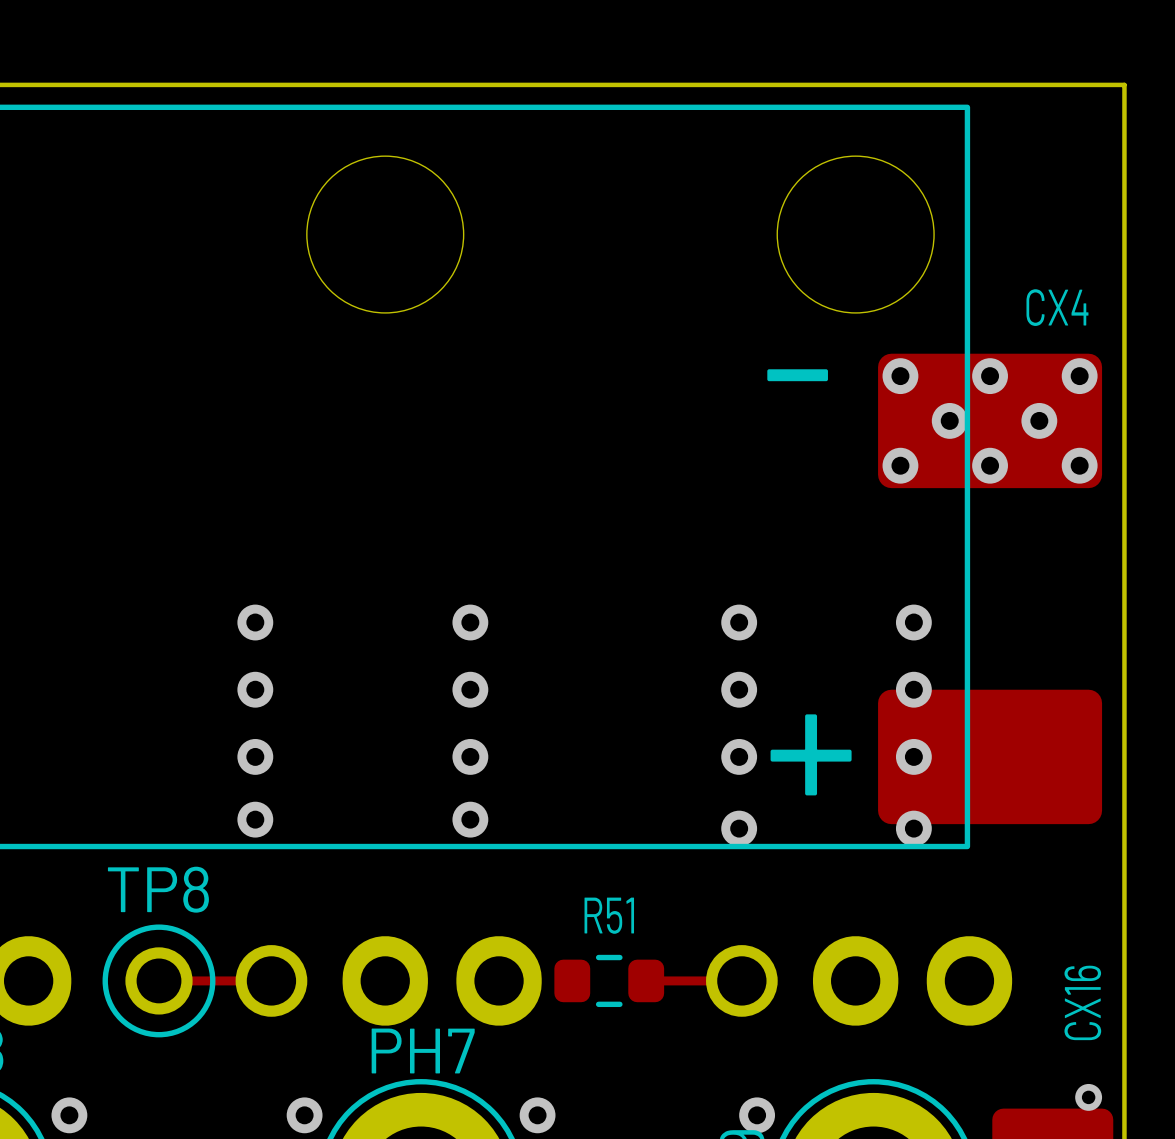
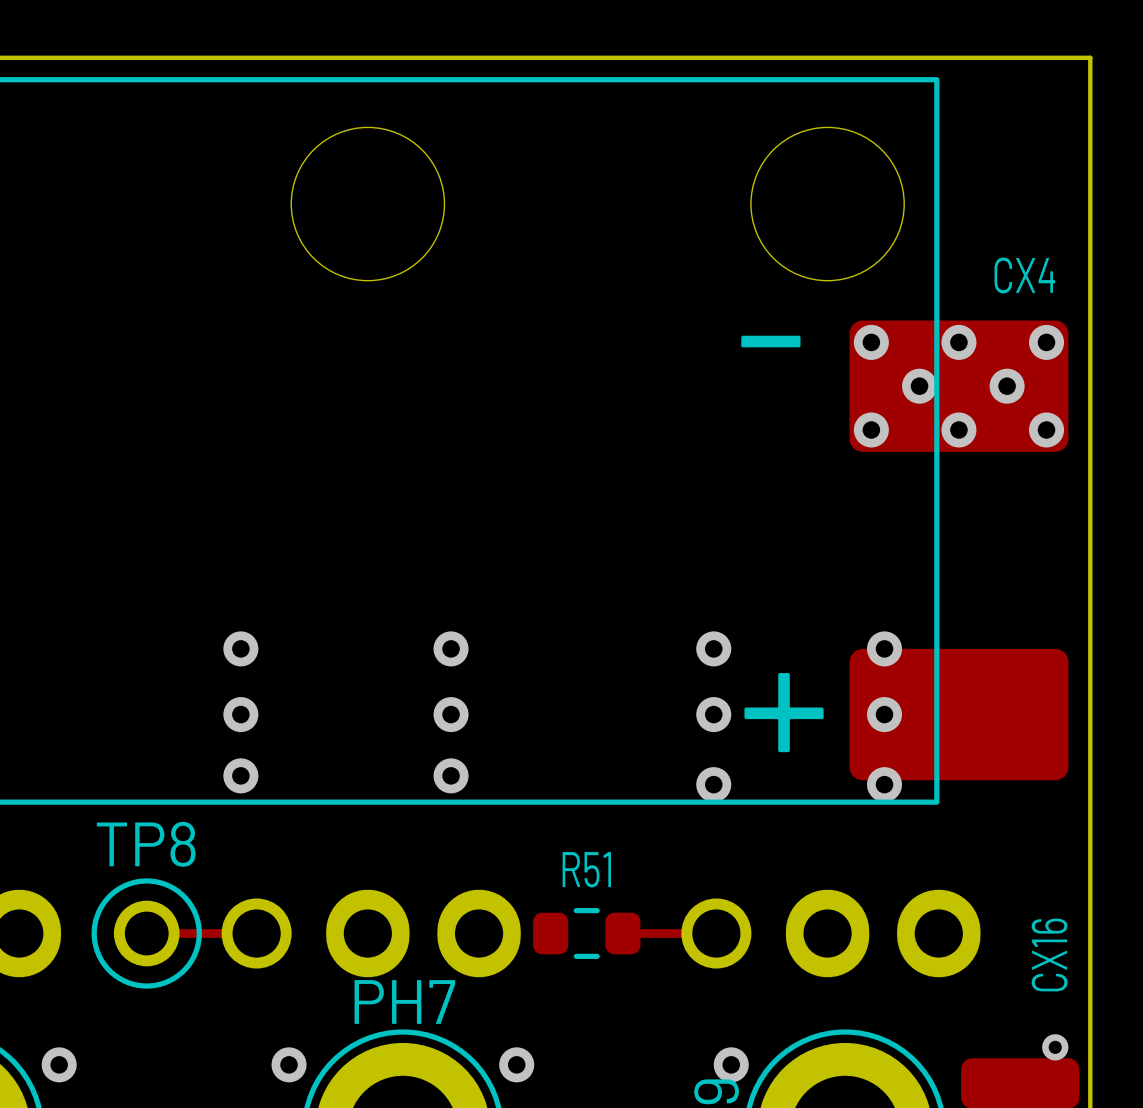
via: (255, 622) -> none
via: (470, 622) -> none
via: (739, 622) -> none
via: (913, 622) -> none

